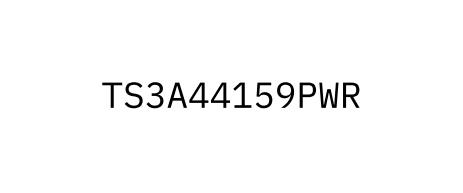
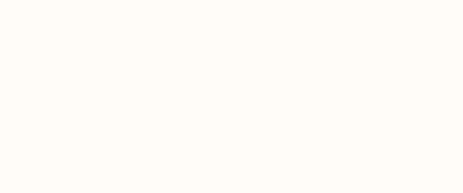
text: TS3A44159PWR (230, 95) -> none

